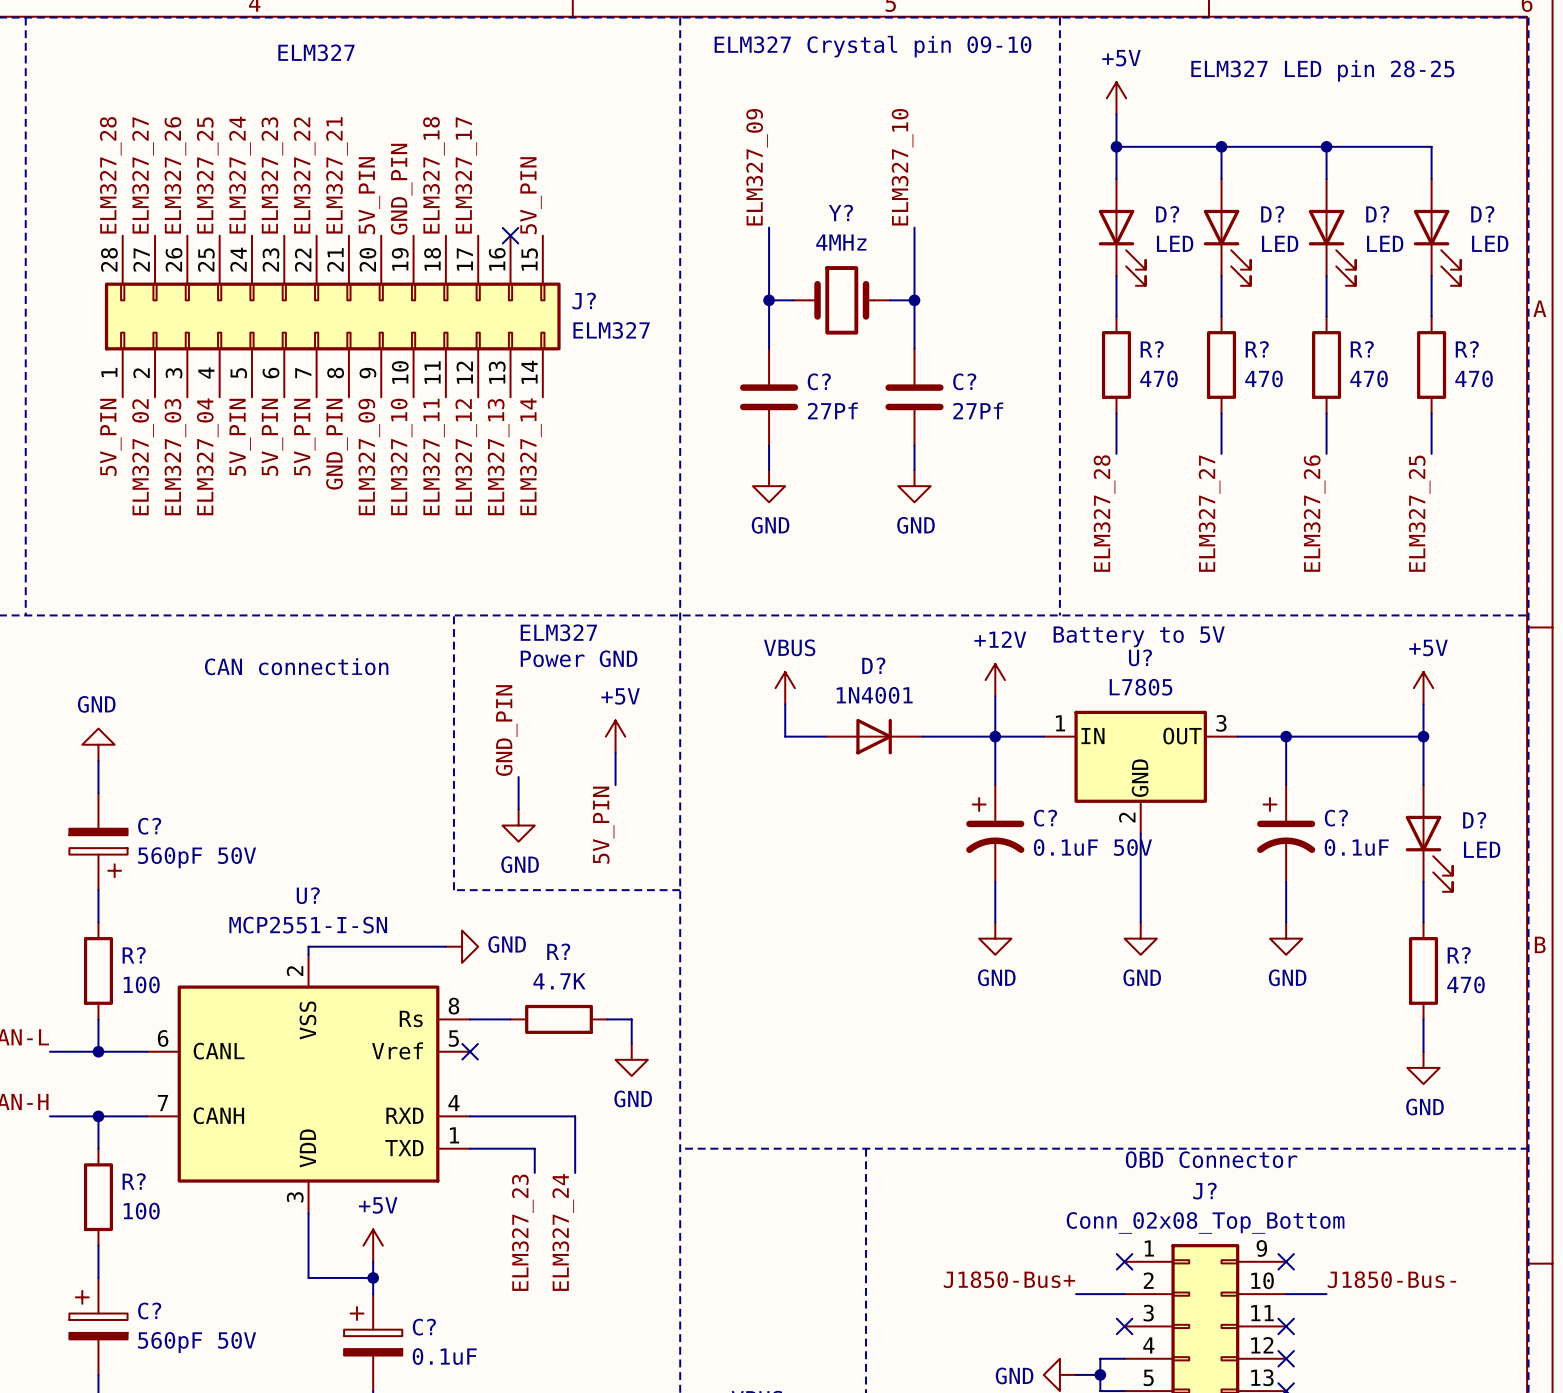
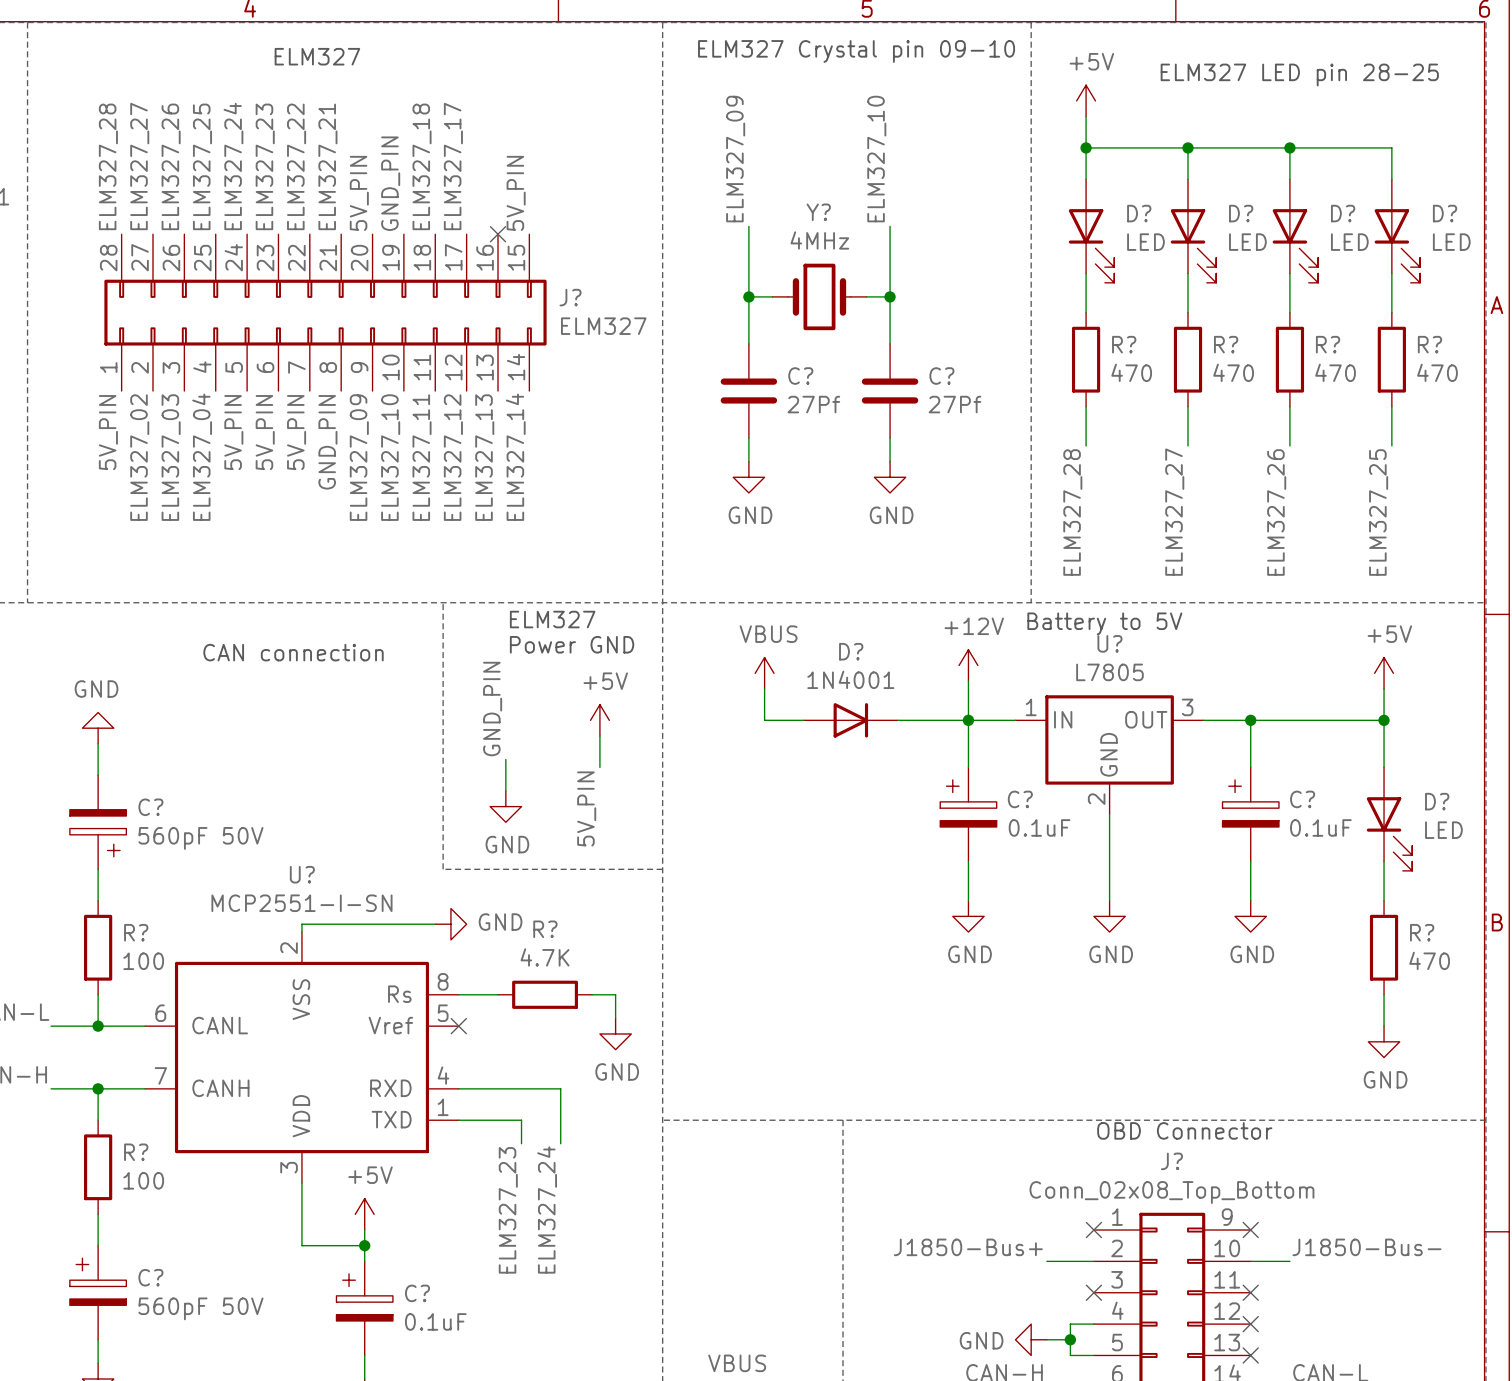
C? symbol: [966, 785, 1025, 883] -> [940, 767, 997, 862]
C? symbol: [1257, 785, 1316, 883] -> [1222, 767, 1279, 862]
C? value: 0.1uF 50V (1092, 847) -> 0.1uF (1039, 827)

